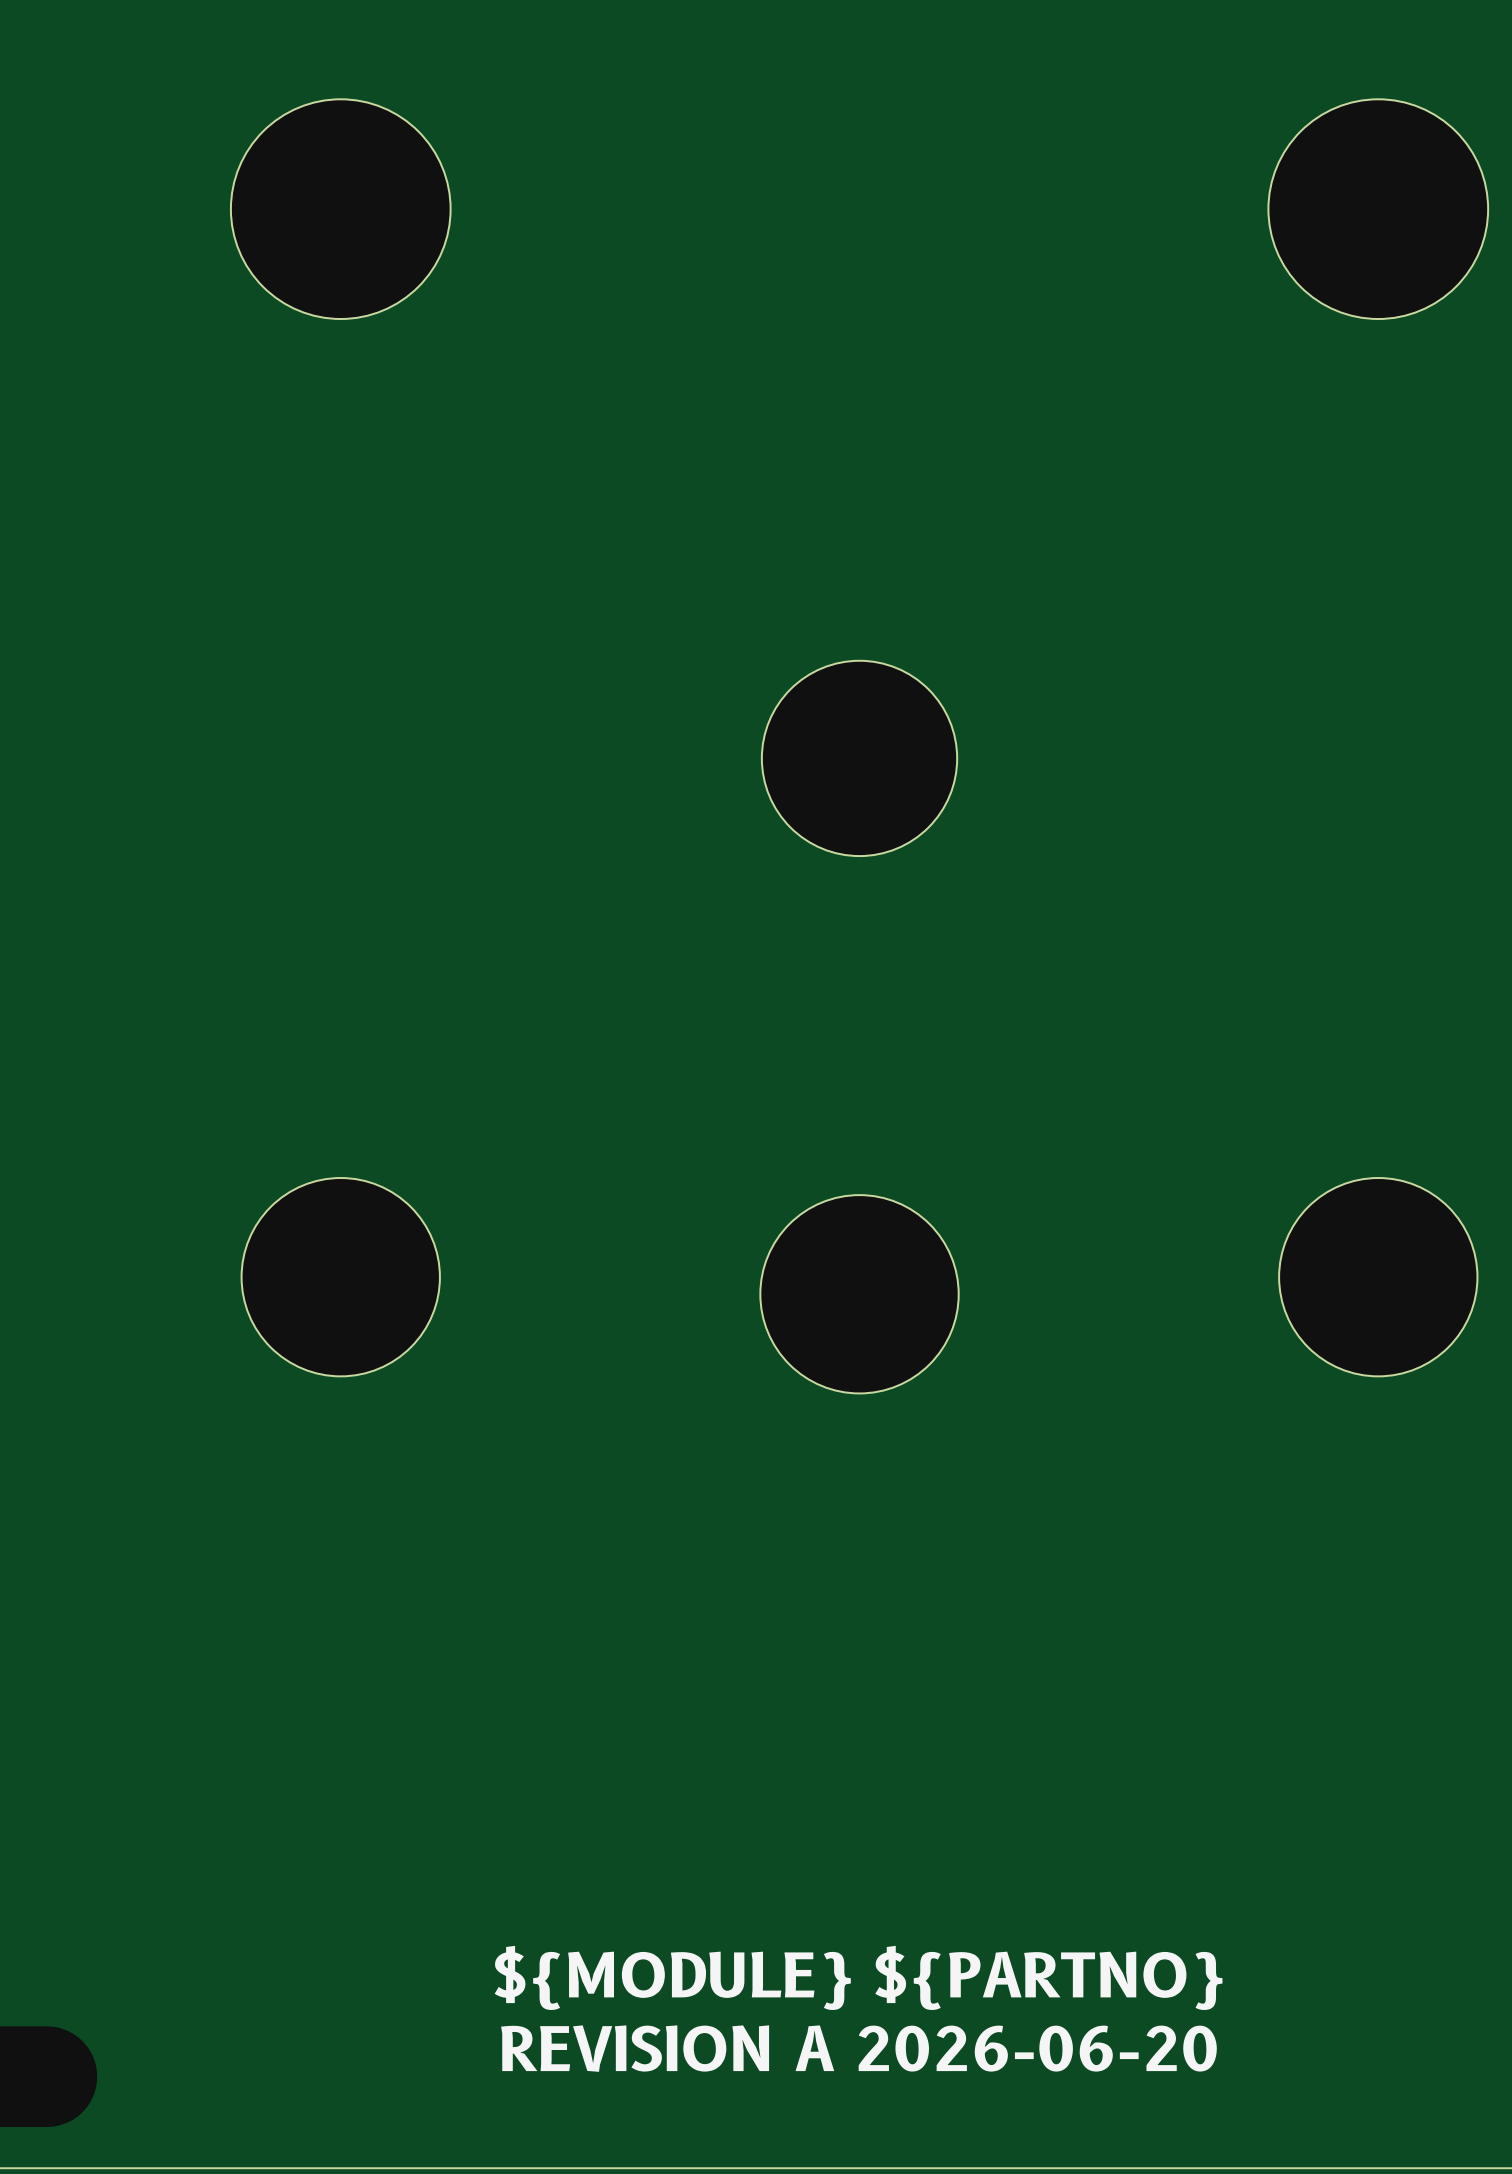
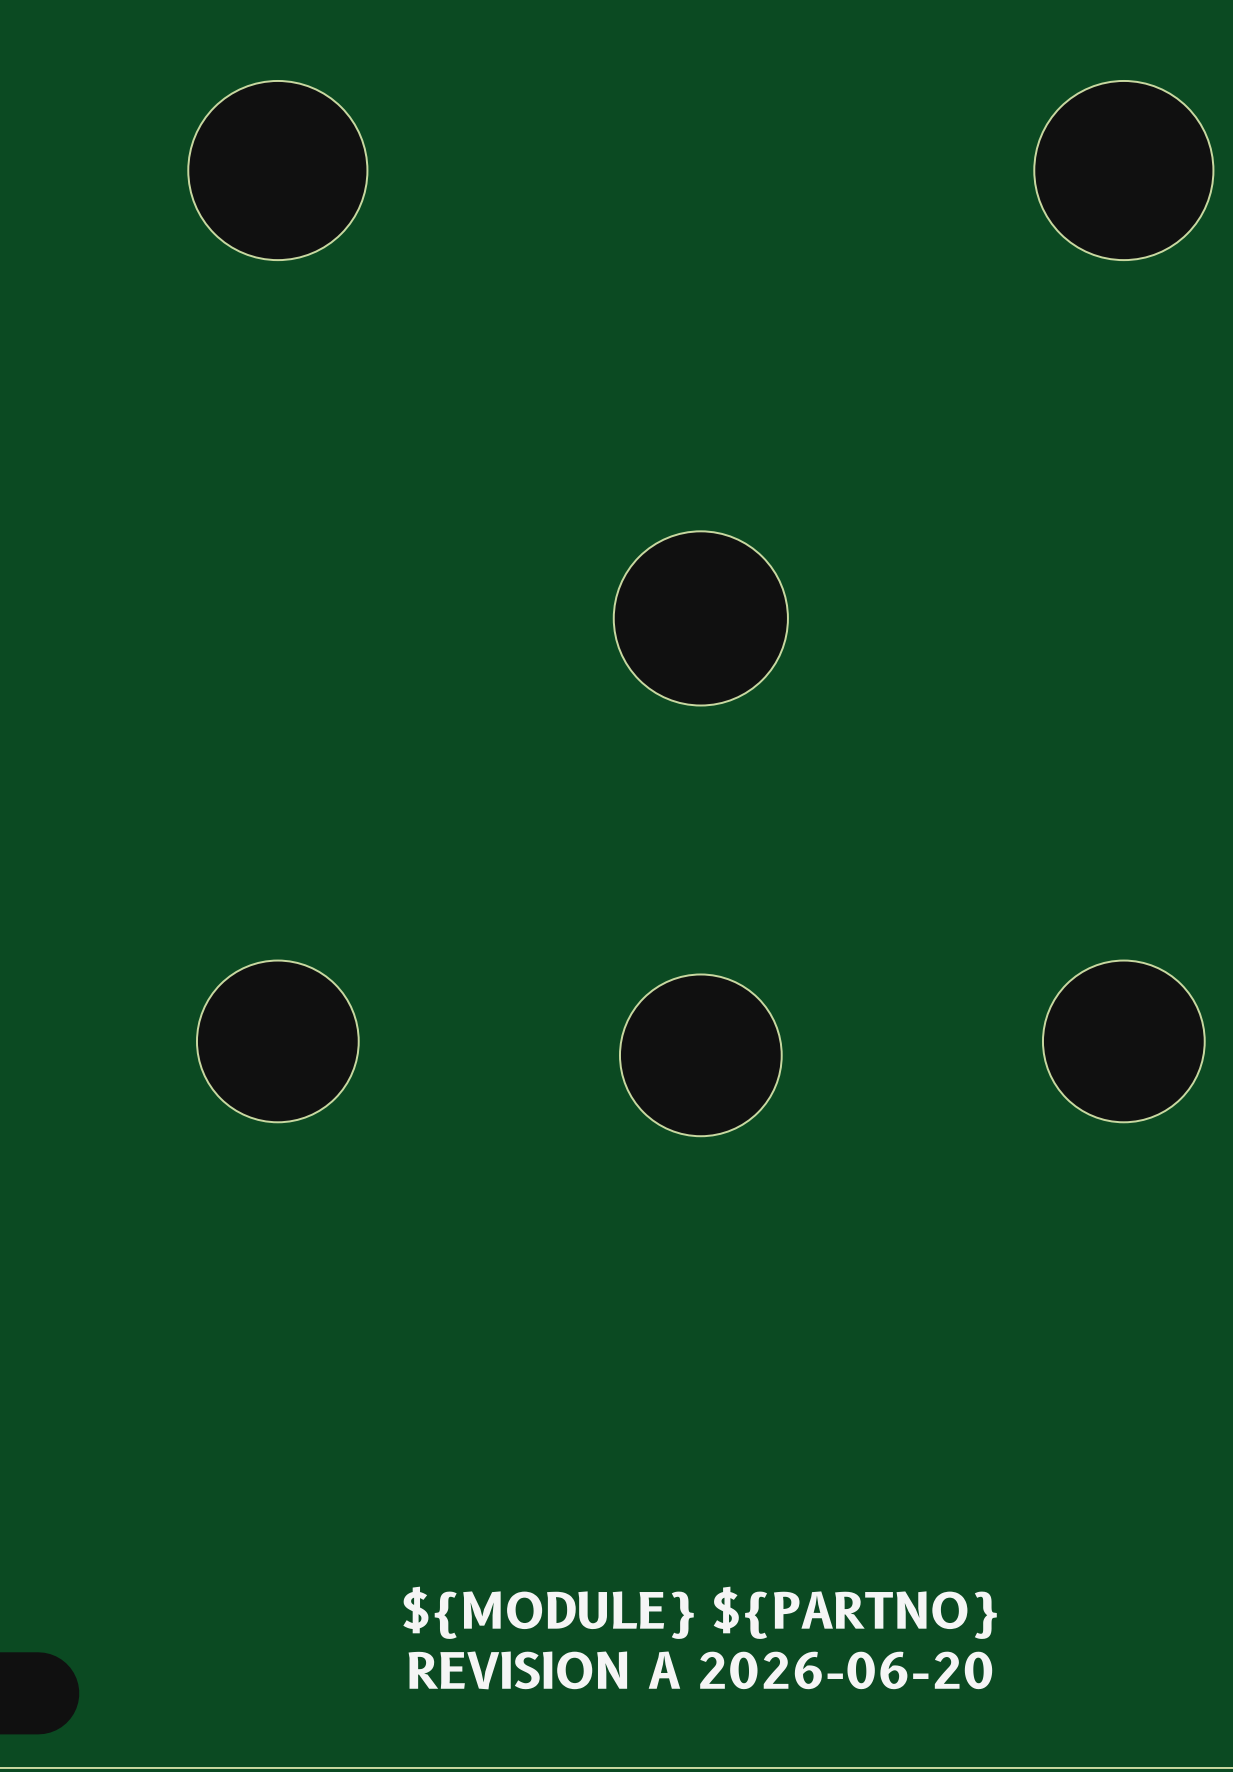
part footprint: [761, 660, 958, 857] -> [613, 531, 788, 706]

